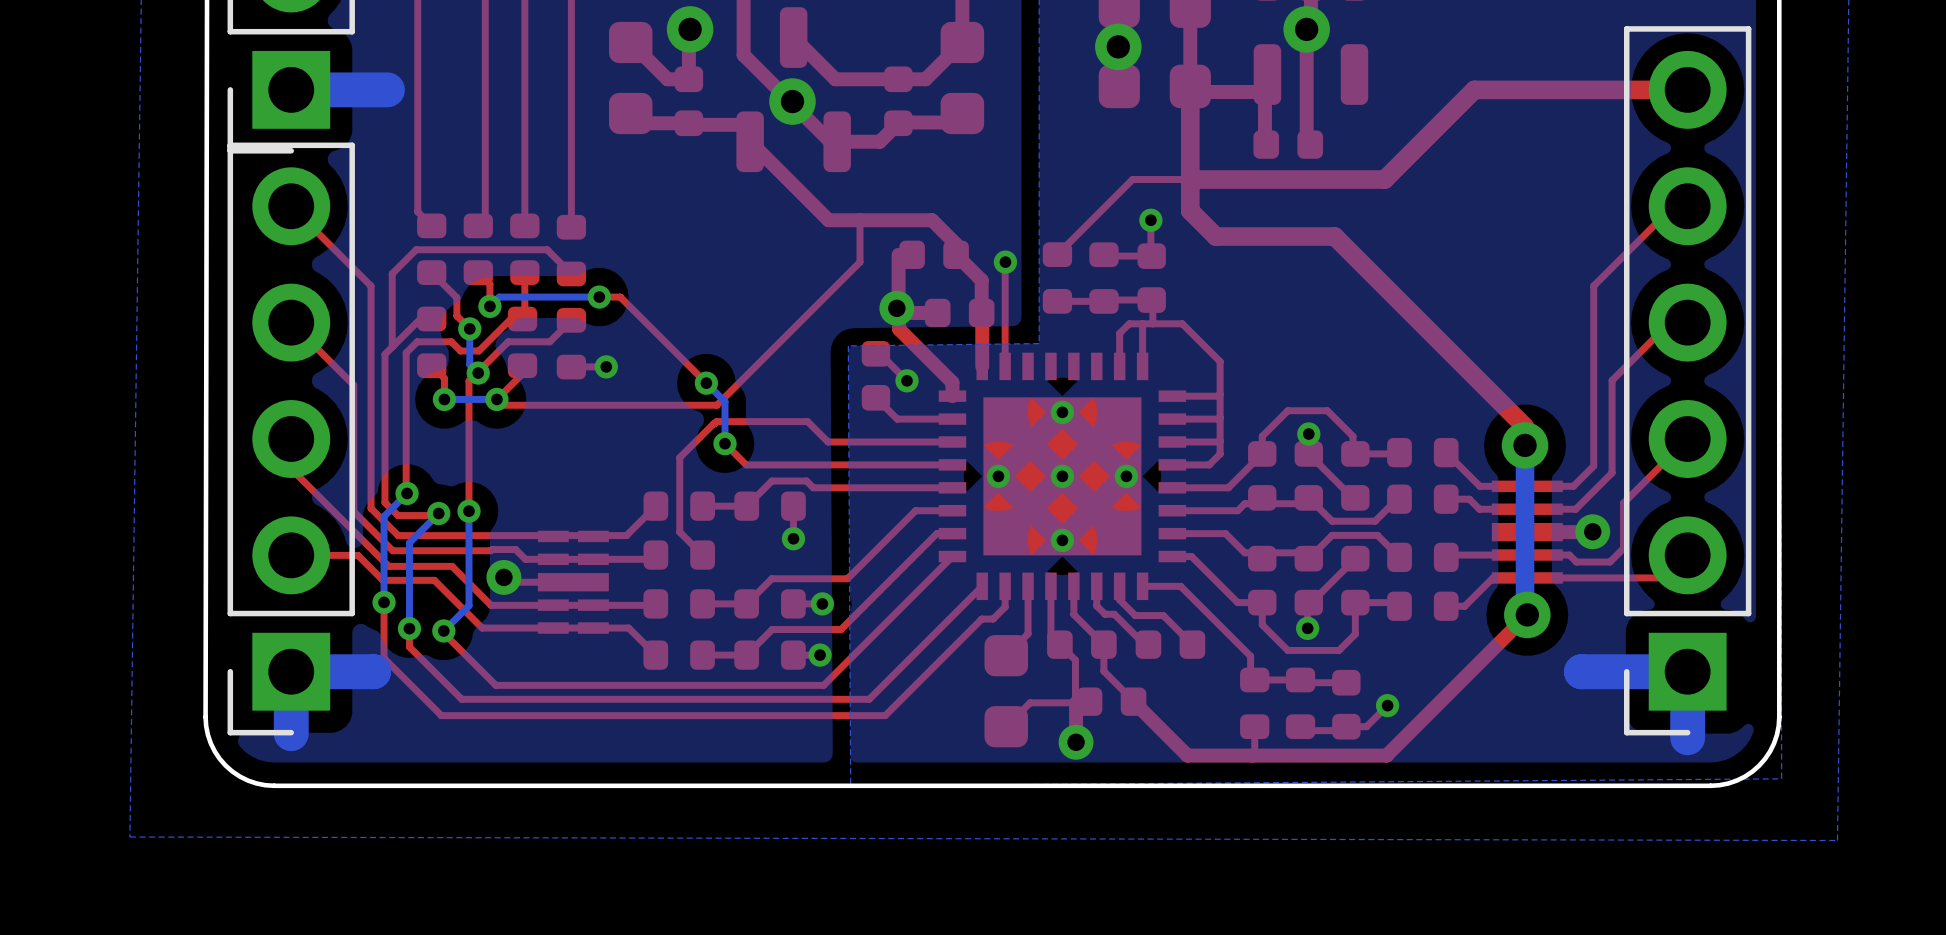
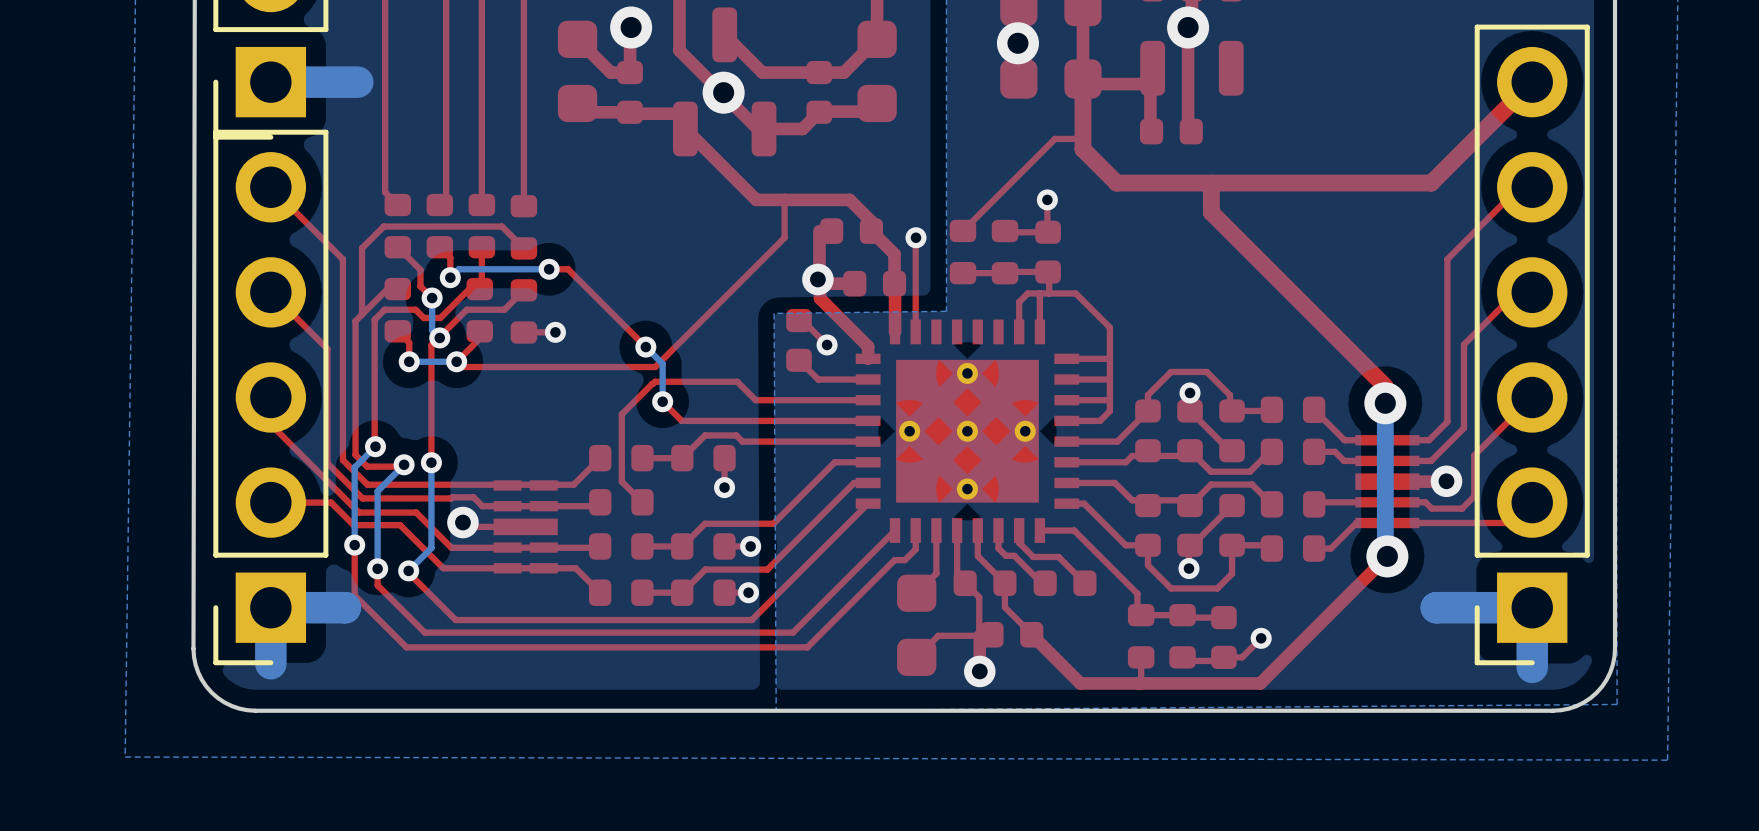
top track: (1687, 89) (1474, 89) (1384, 179) (1132, 179) -> (1532, 82) (1431, 183) (1116, 183) (1082, 149)
top track: none -> (1082, 138) (1054, 138) (1030, 163)
top track: (1190, 164) (1190, 210) (1215, 236) (1334, 236) -> (1211, 183) (1211, 212) (1213, 214)

